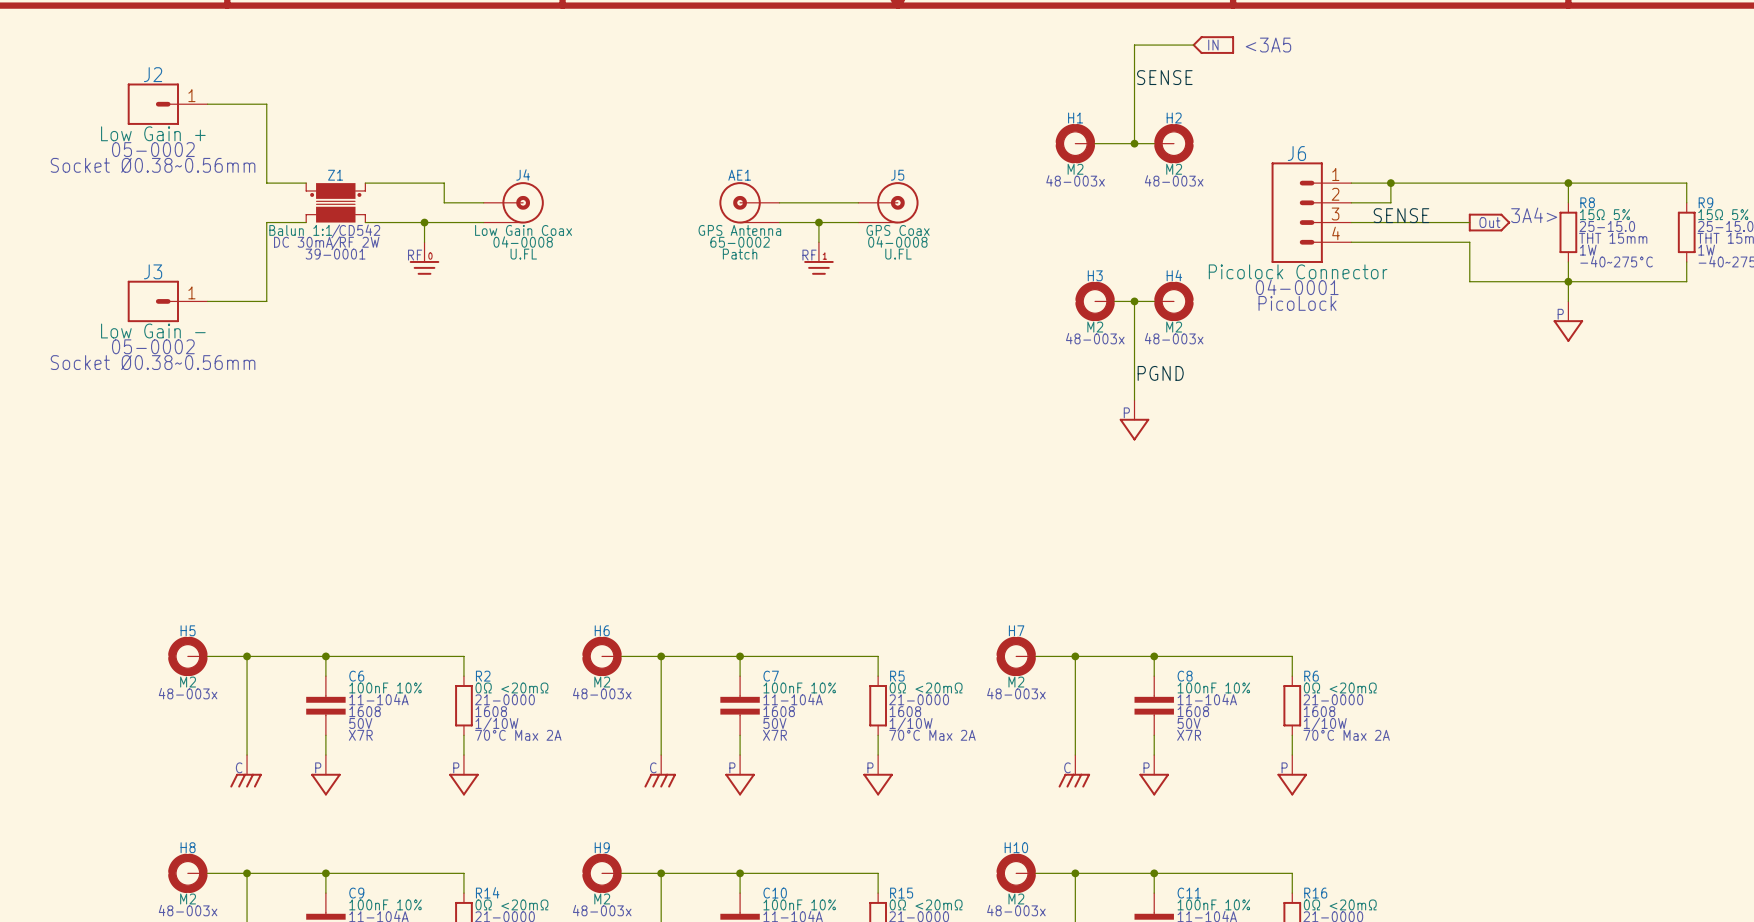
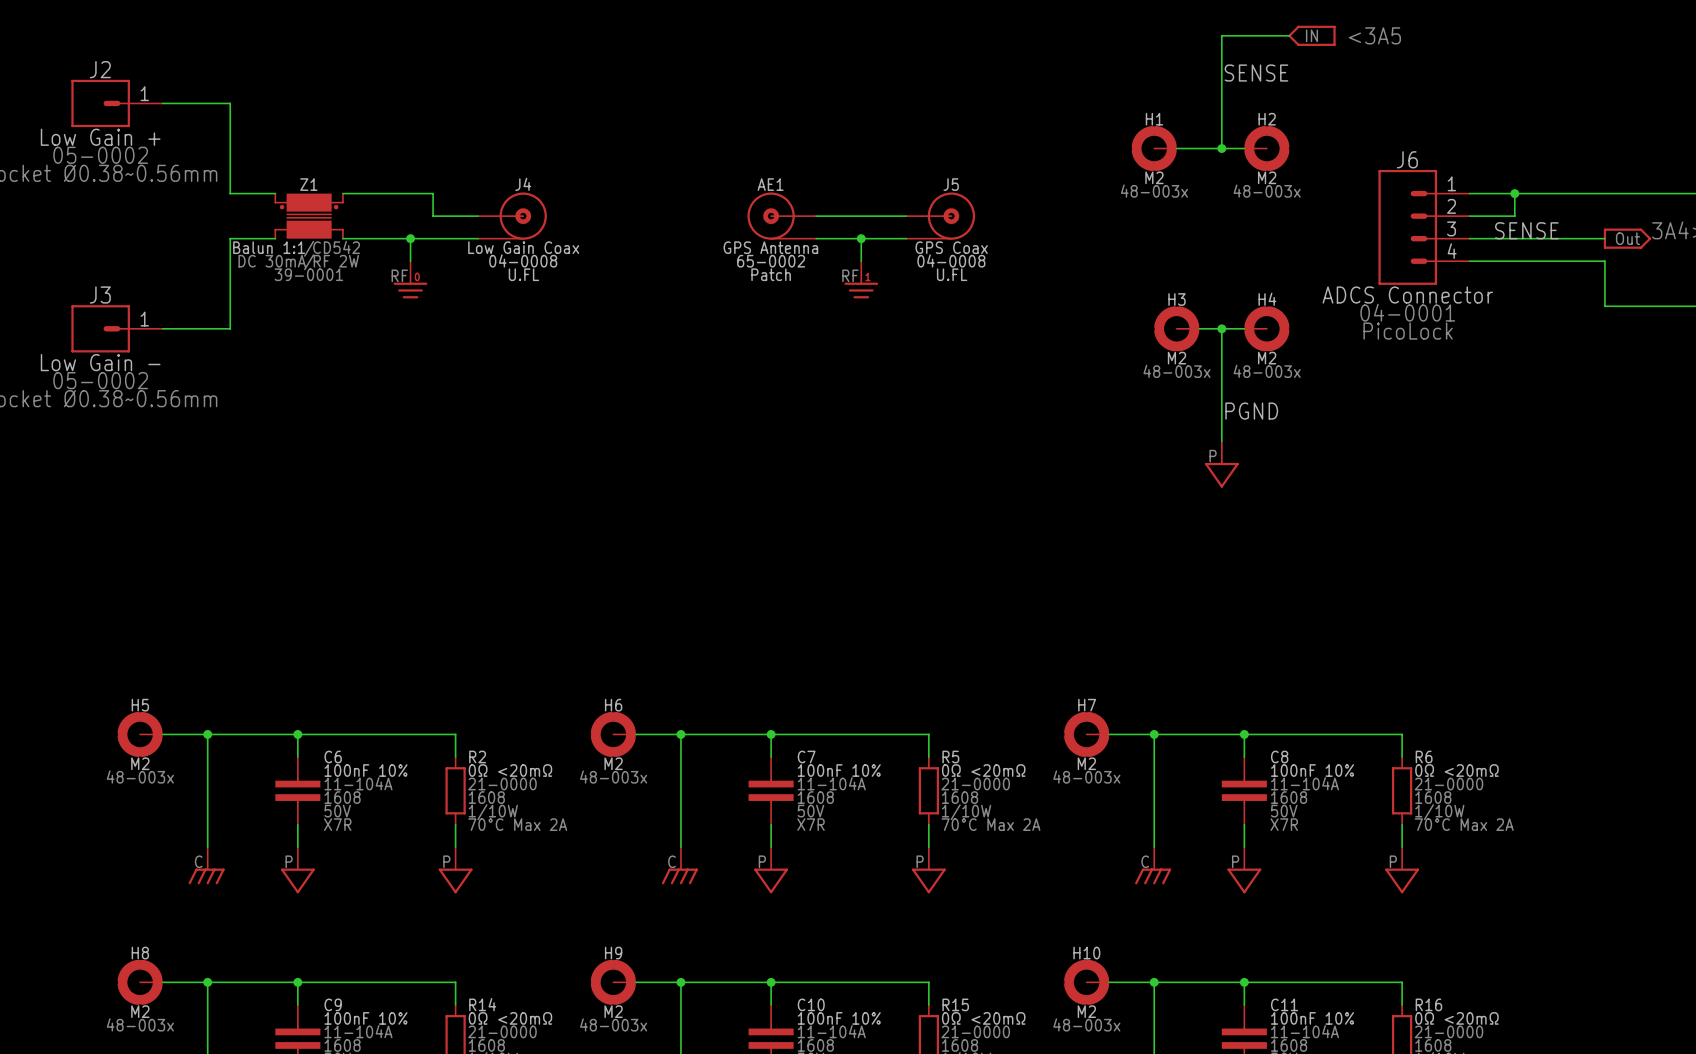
J6 value: Picolock Connector (1298, 271) -> ADCS Connector (1407, 295)

